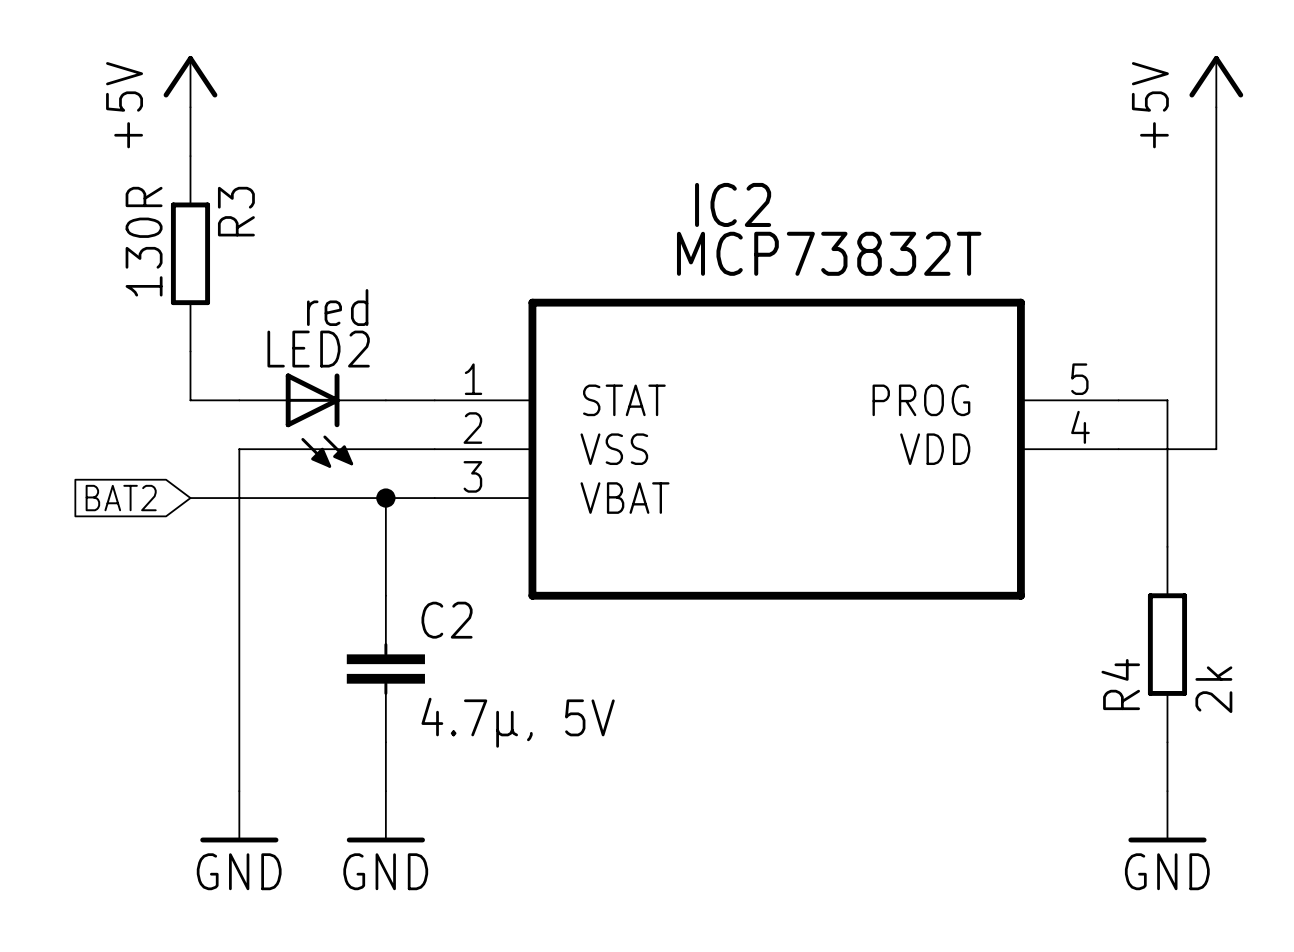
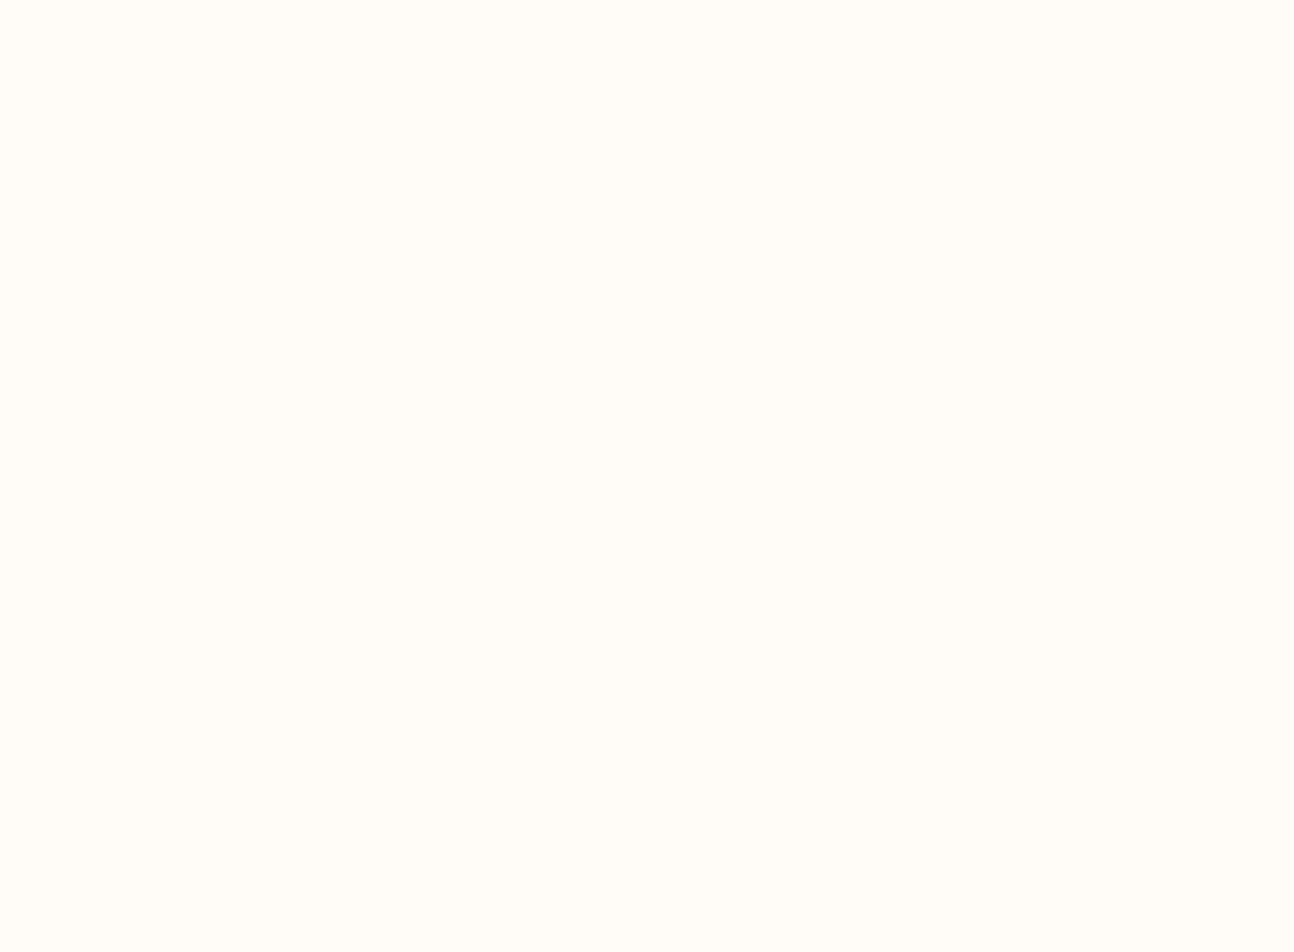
power symbol: +5V (190, 81) -> none
power symbol: +5V (1216, 81) -> none
wire: (190, 107) (190, 156) -> none
wire: (1216, 107) (1216, 449) (1118, 449) -> none
R3: 130R (190, 253) -> none
wire: (190, 351) (190, 400) (239, 400) -> none
wire: (385, 400) (434, 400) -> none
wire: (1118, 400) (1167, 400) (1167, 546) -> none
LED2: red (312, 420) -> none
wire: (434, 449) (239, 449) (239, 791) -> none
IC2: MCP73832T (776, 449) -> none
global label: BAT2 (121, 498) -> none
wire: (190, 498) (434, 498) -> none
wire: (385, 498) (385, 595) -> none
junction: (385, 498) -> none
R4: 2k (1167, 644) -> none
C2: 4.7µ, 5V (385, 669) -> none
wire: (385, 742) (385, 791) -> none
wire: (1167, 742) (1167, 791) -> none
power symbol: GND (239, 816) -> none
power symbol: GND (385, 816) -> none
power symbol: GND (1167, 816) -> none

